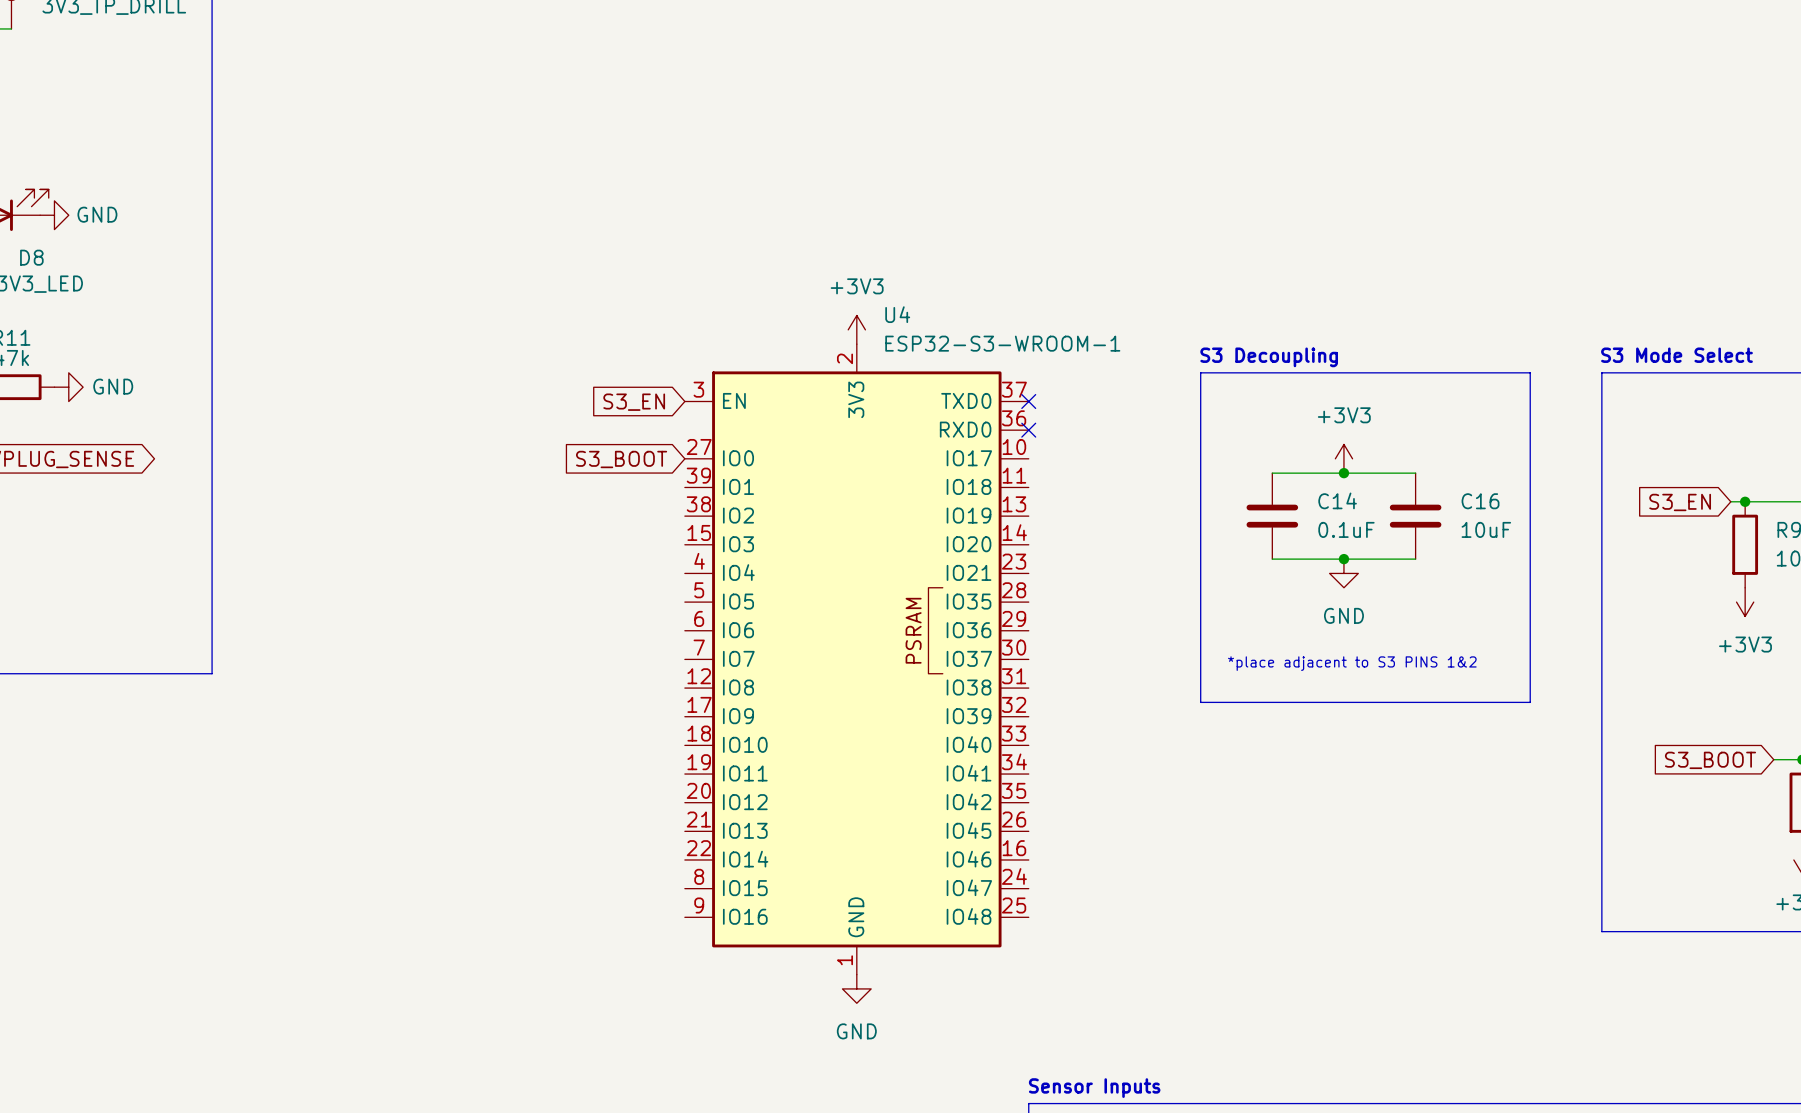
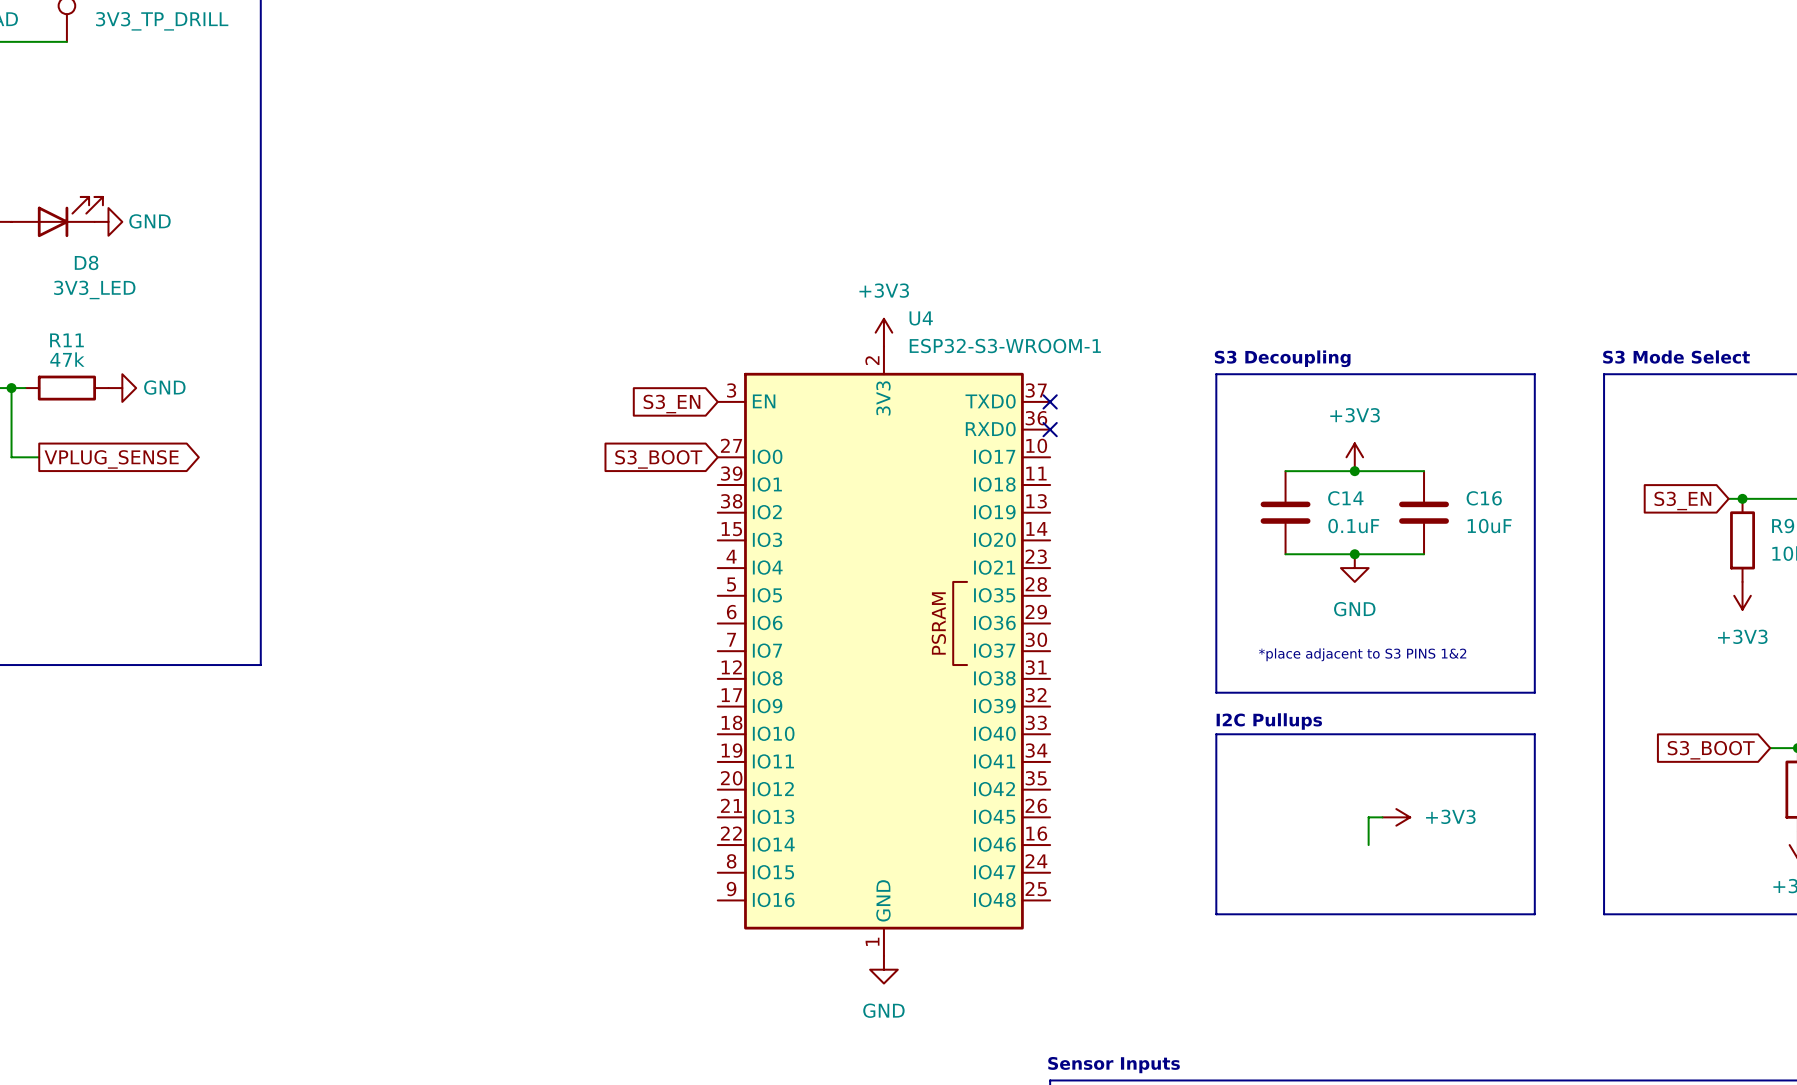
text: none -> I2C Pullups (1269, 721)
line: none -> (1216, 734) (1534, 734) (1534, 914) (1216, 914) (1216, 734)
wire: none -> (1382, 817) (1368, 817) (1368, 845)
power symbol: none -> +3V3 (1396, 817)

